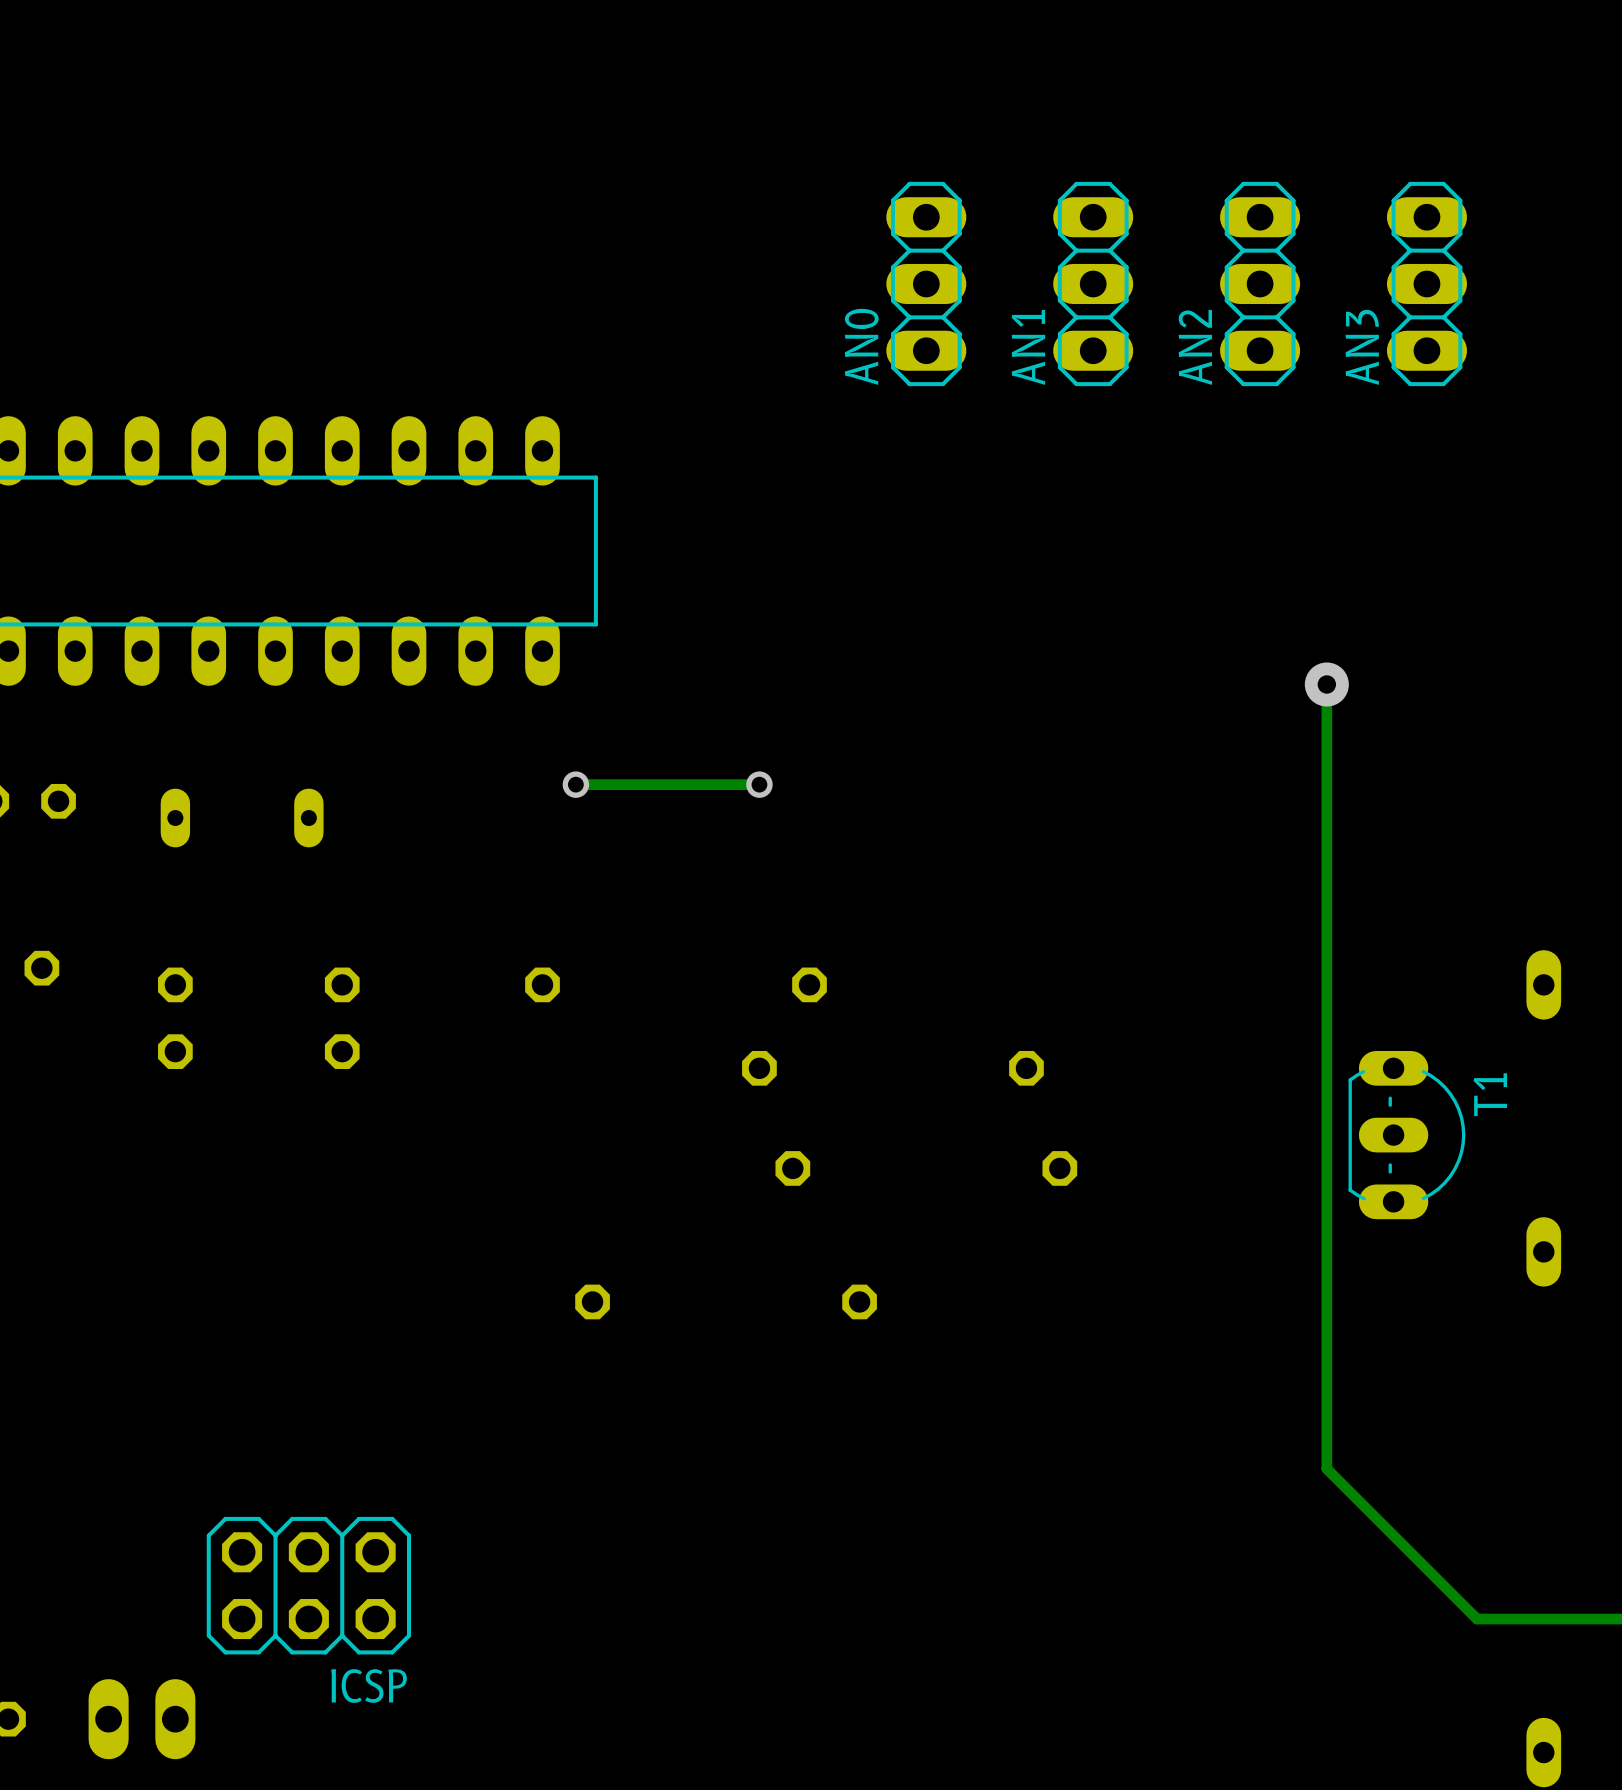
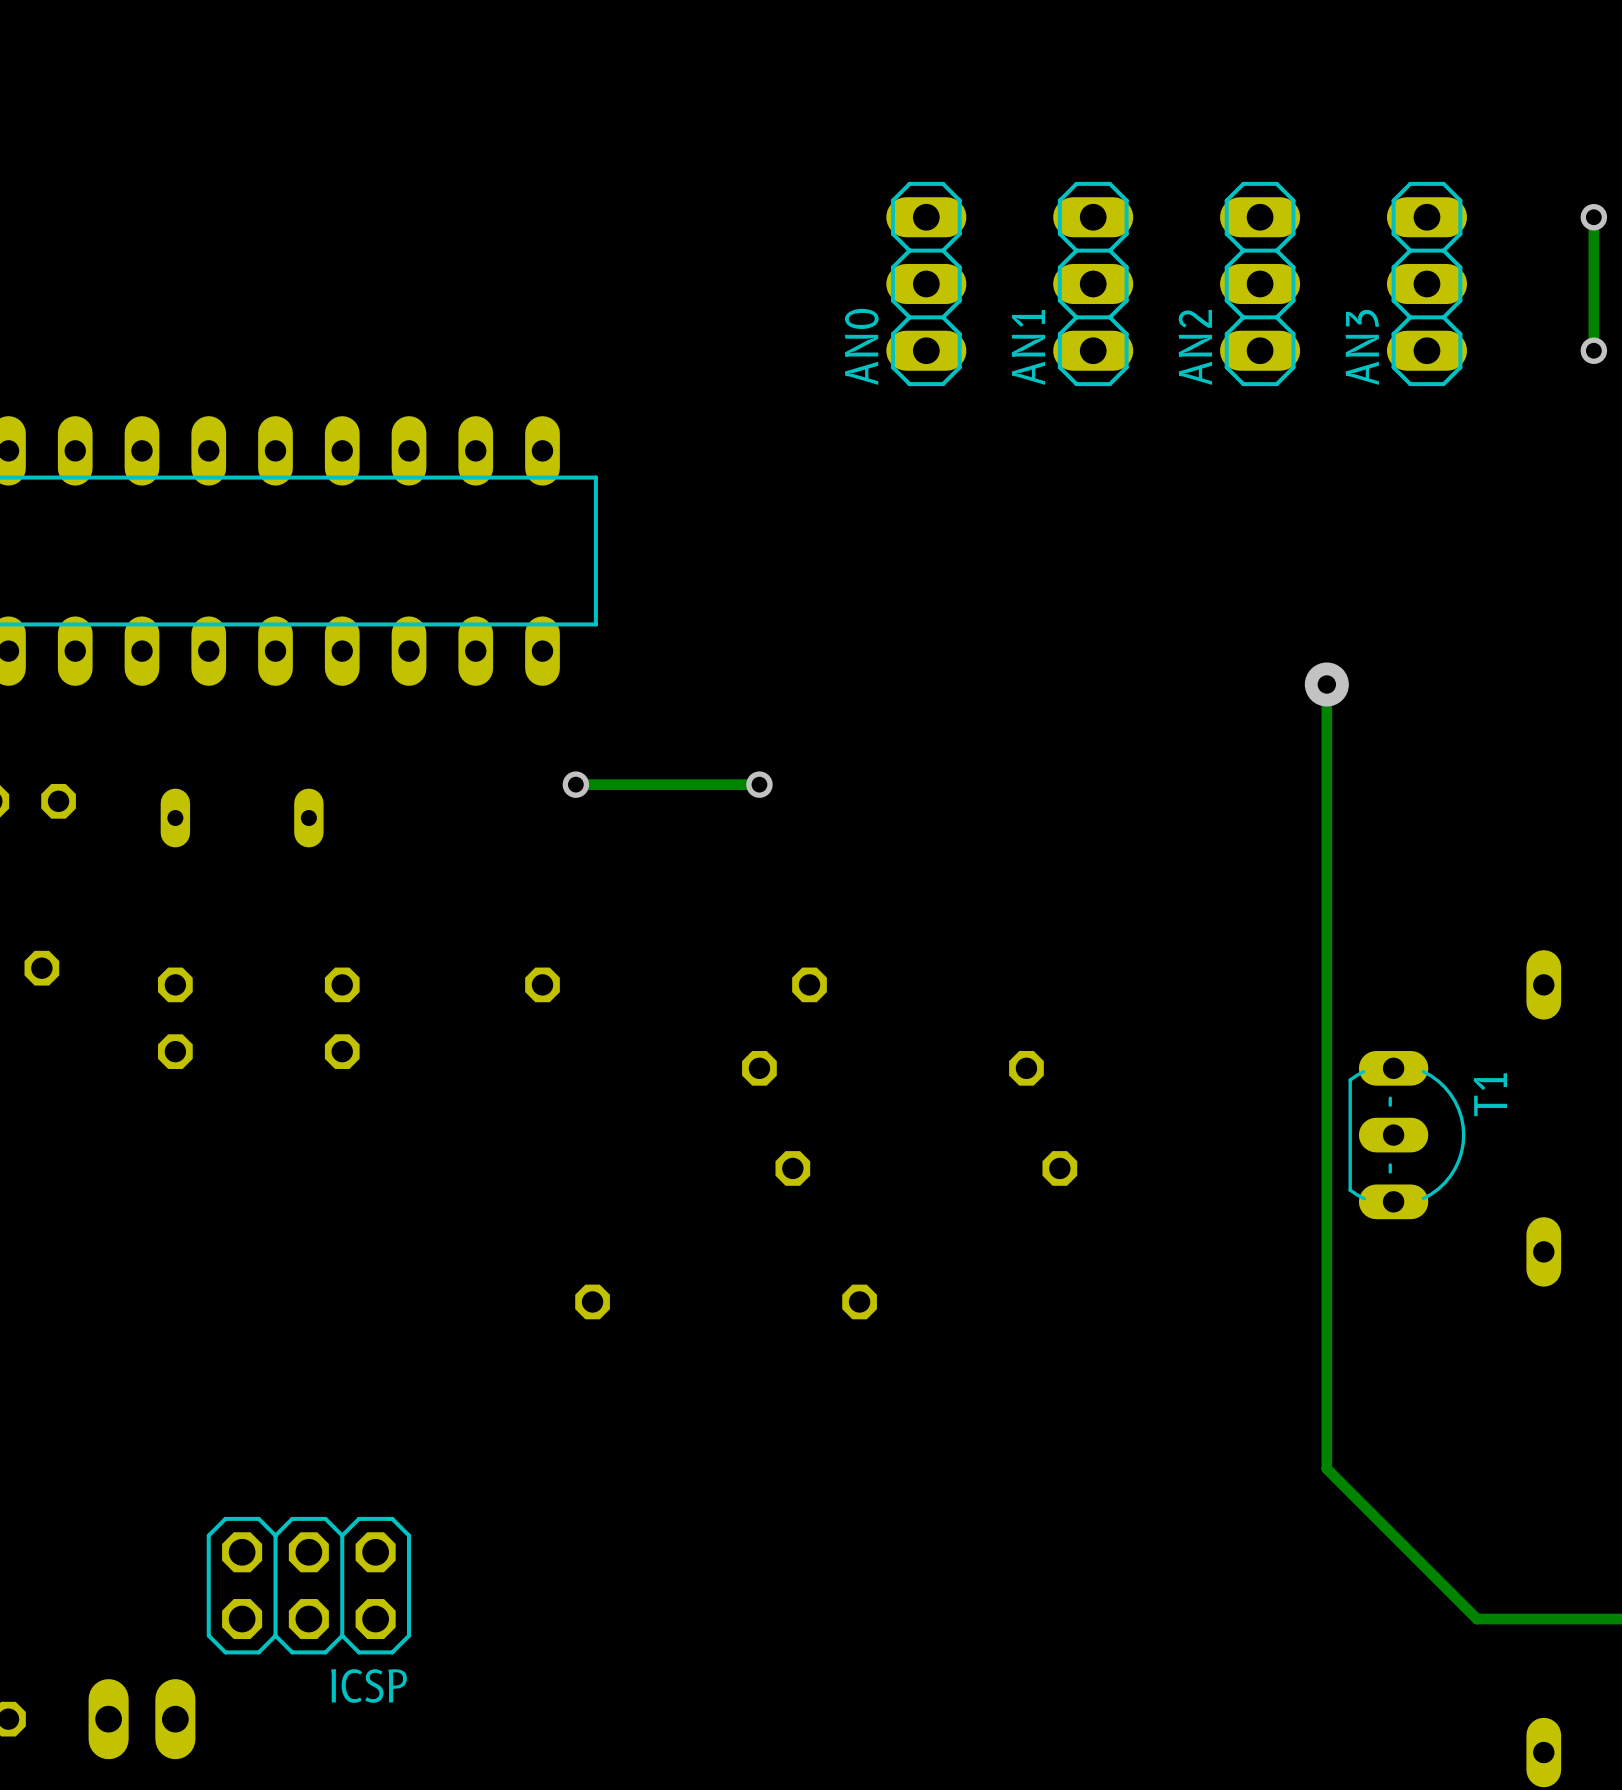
track: none -> (1593, 217) (1593, 350)
via: none -> (1593, 217)
via: none -> (1593, 350)

